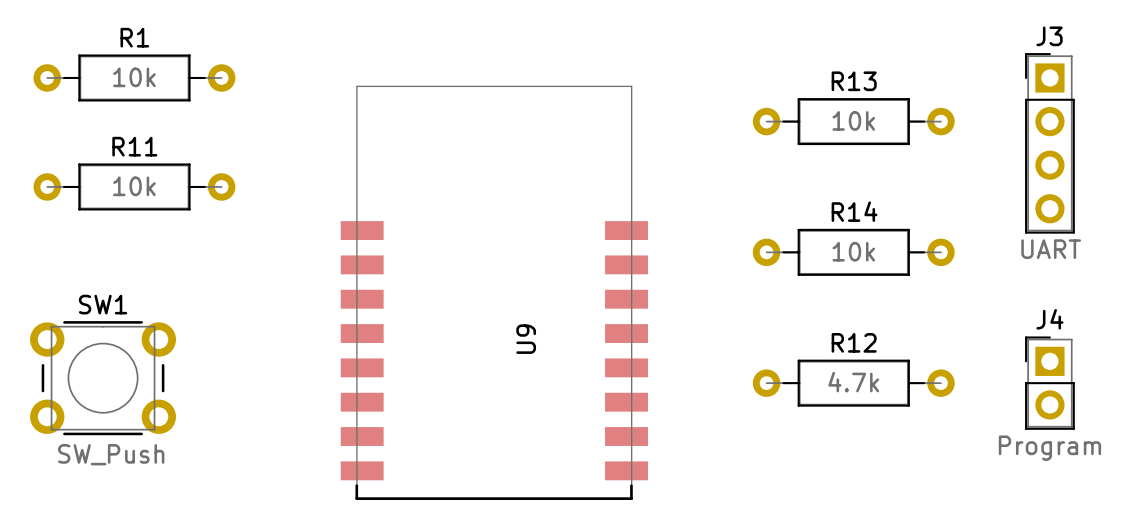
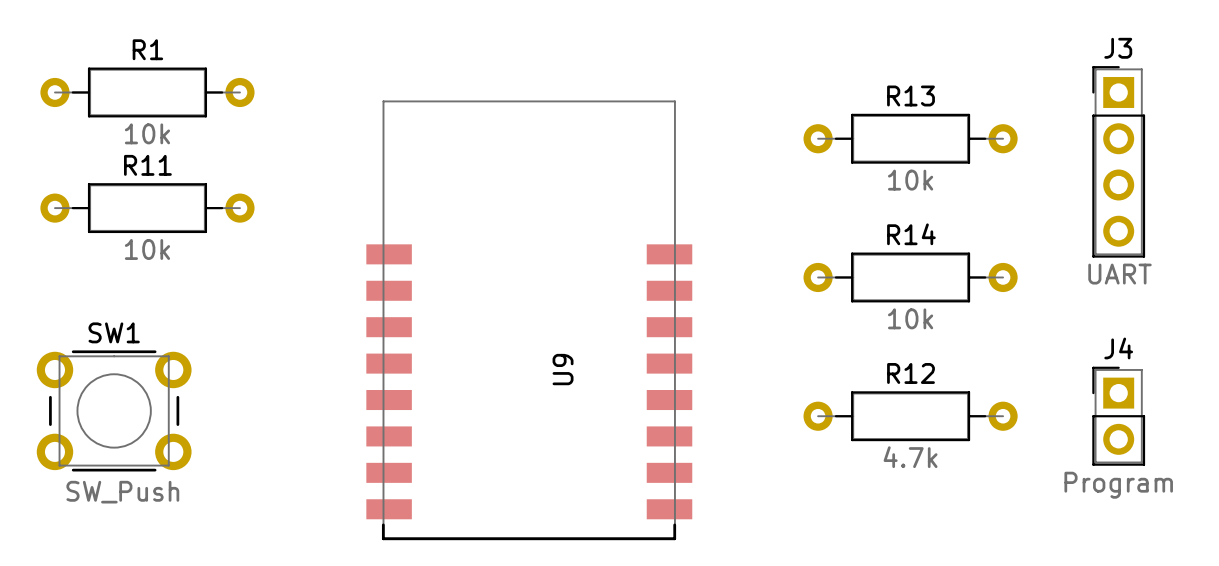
R1 value position: 10k (134, 77) -> 10k (147, 133)
R13 value position: 10k (853, 120) -> 10k (910, 180)
R11 value position: 10k (134, 186) -> 10k (147, 249)
R14 value position: 10k (853, 251) -> 10k (910, 318)
R12 value position: 4.7k (853, 382) -> 4.7k (910, 457)

